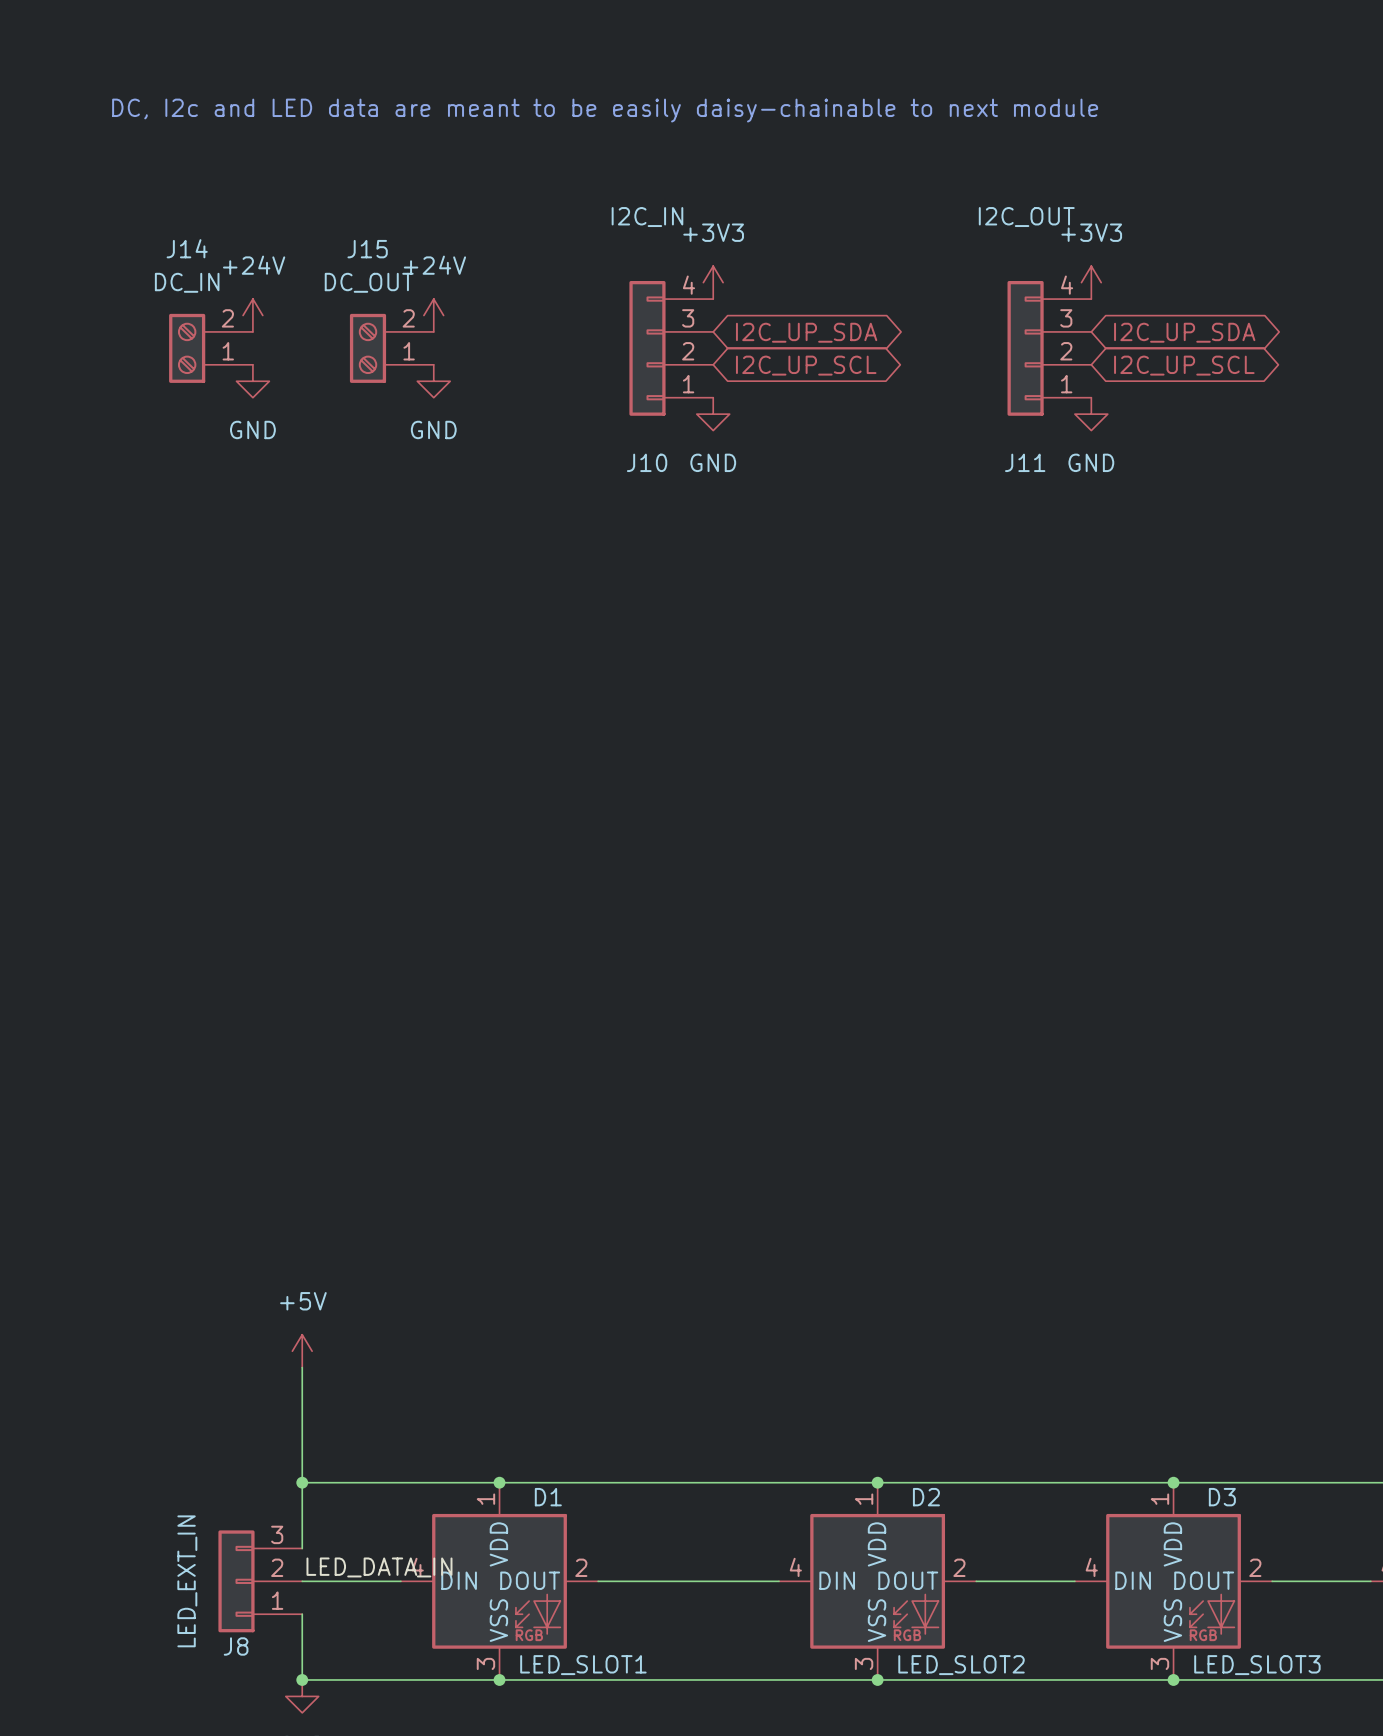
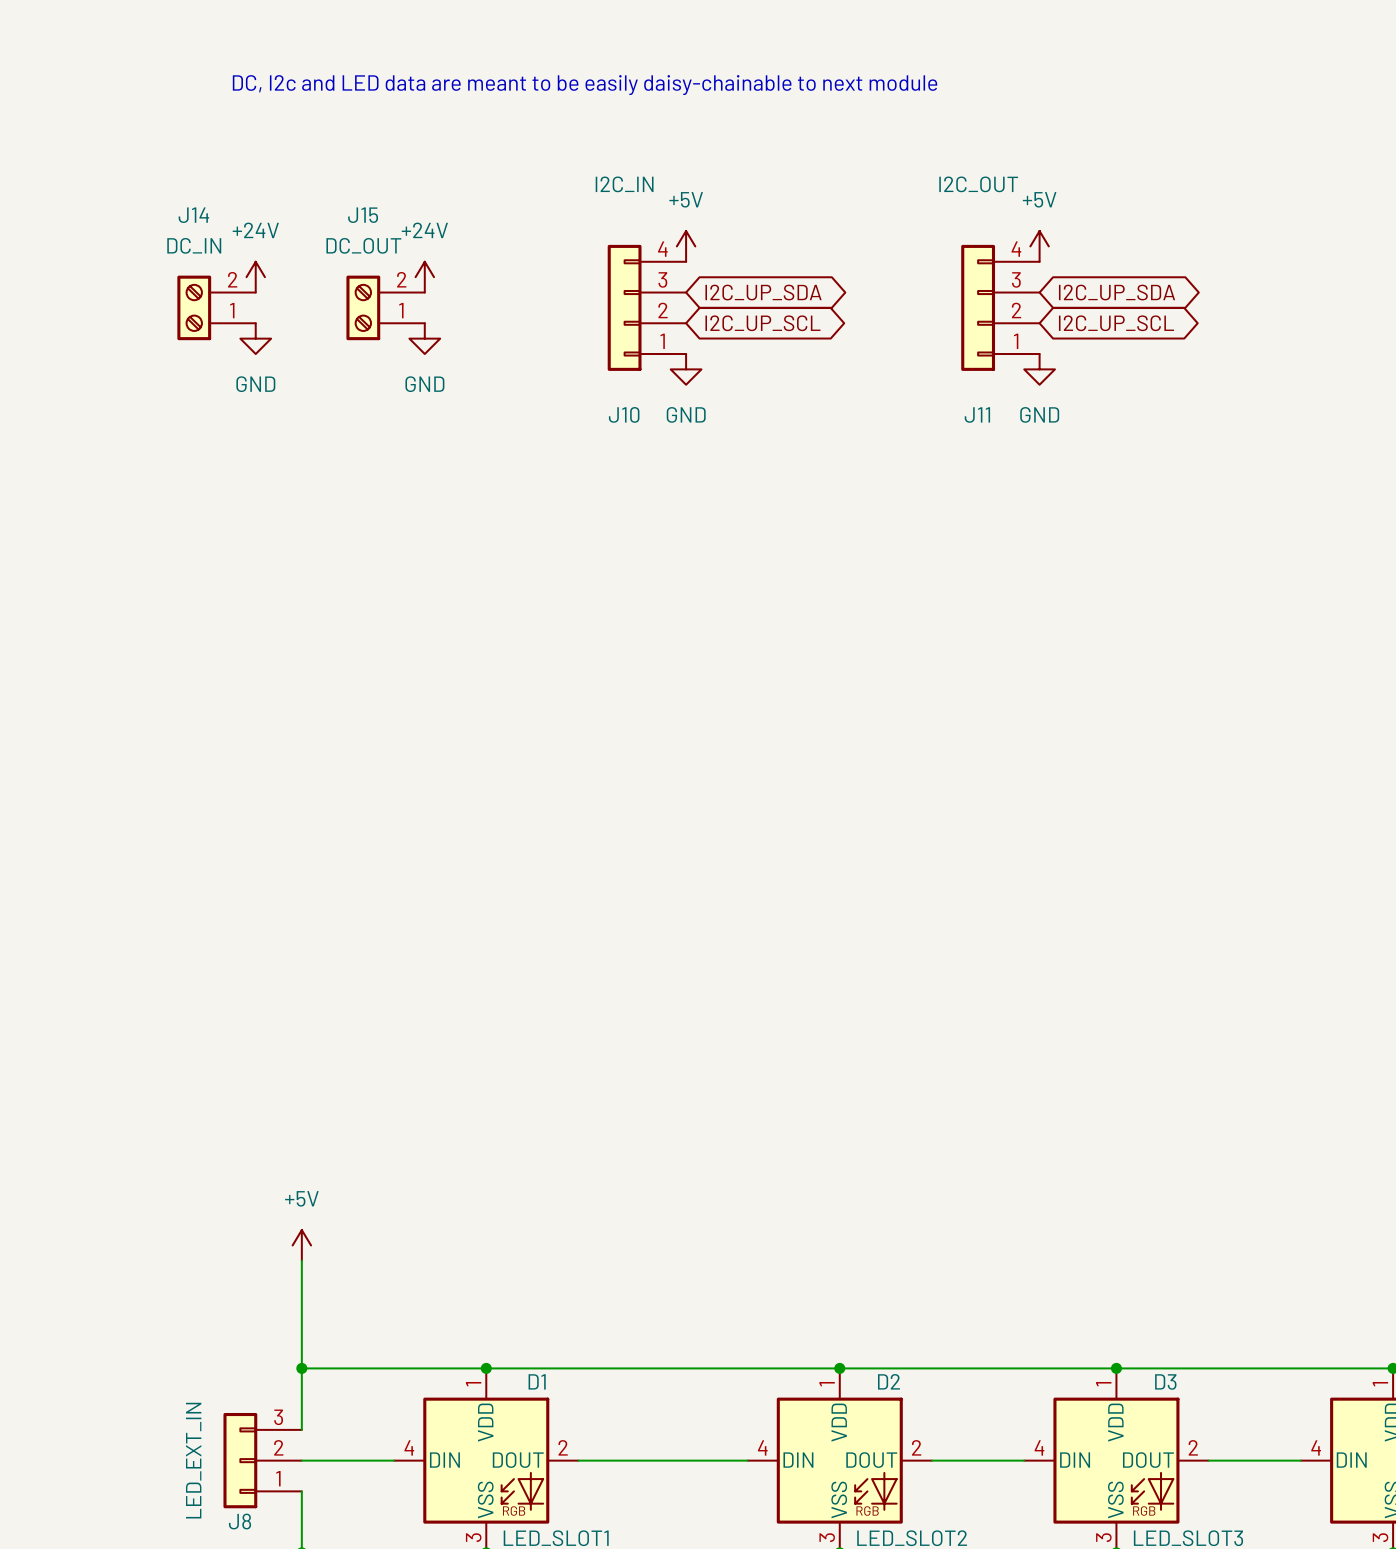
power symbol: +3V3 (713, 282) -> +5V (686, 246)
power symbol: +3V3 (1091, 282) -> +5V (1039, 246)
label: LED_DATA_IN (379, 1567) -> none

